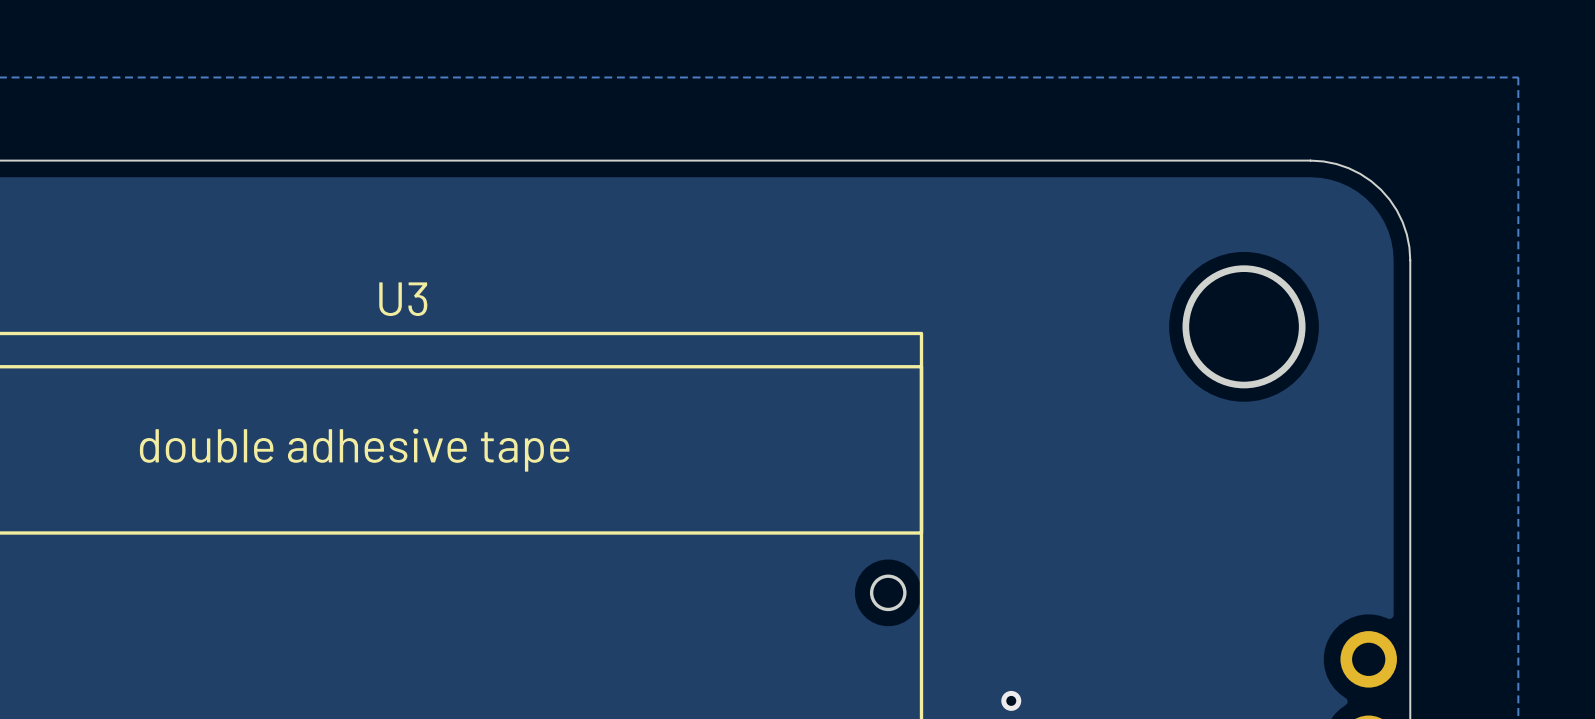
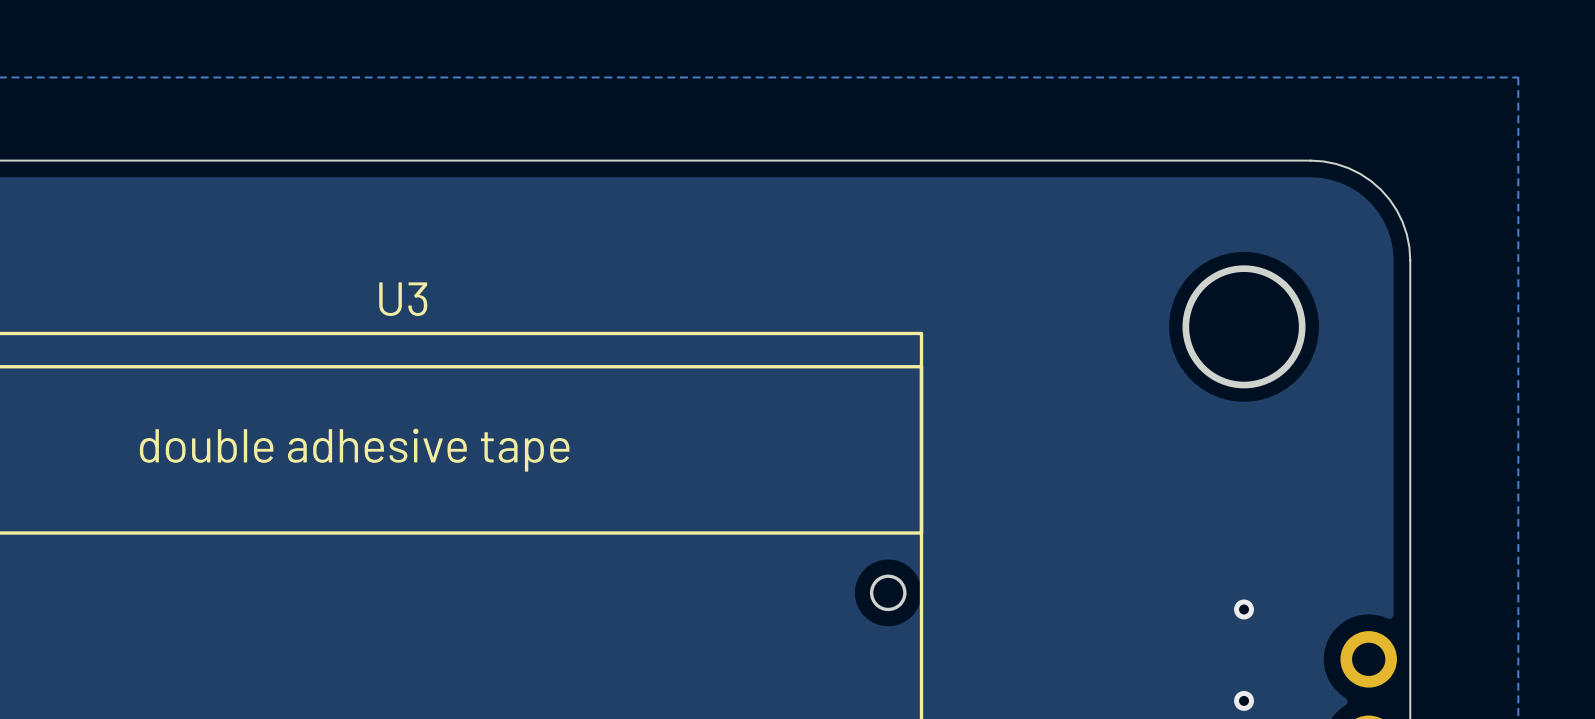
via: none -> (1244, 609)
via: (1011, 700) -> none
via: none -> (1244, 700)

